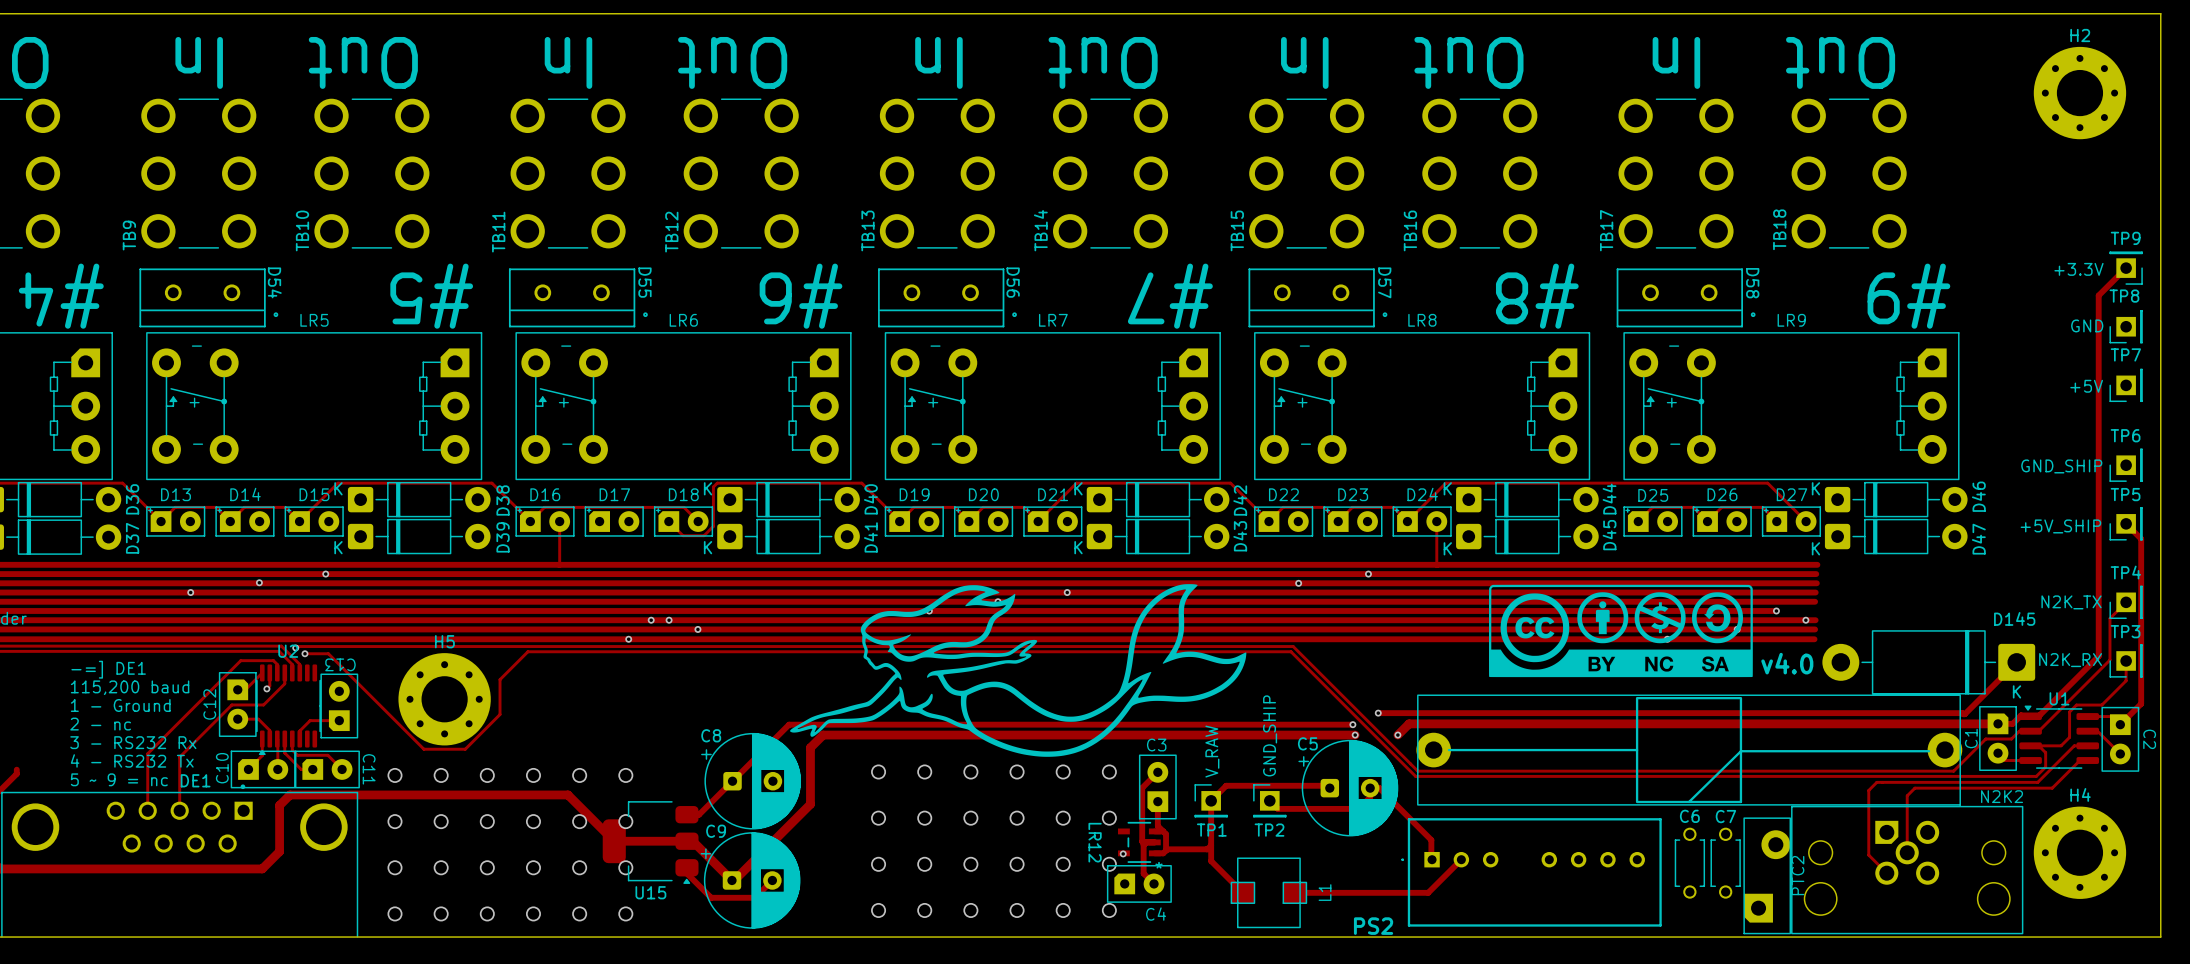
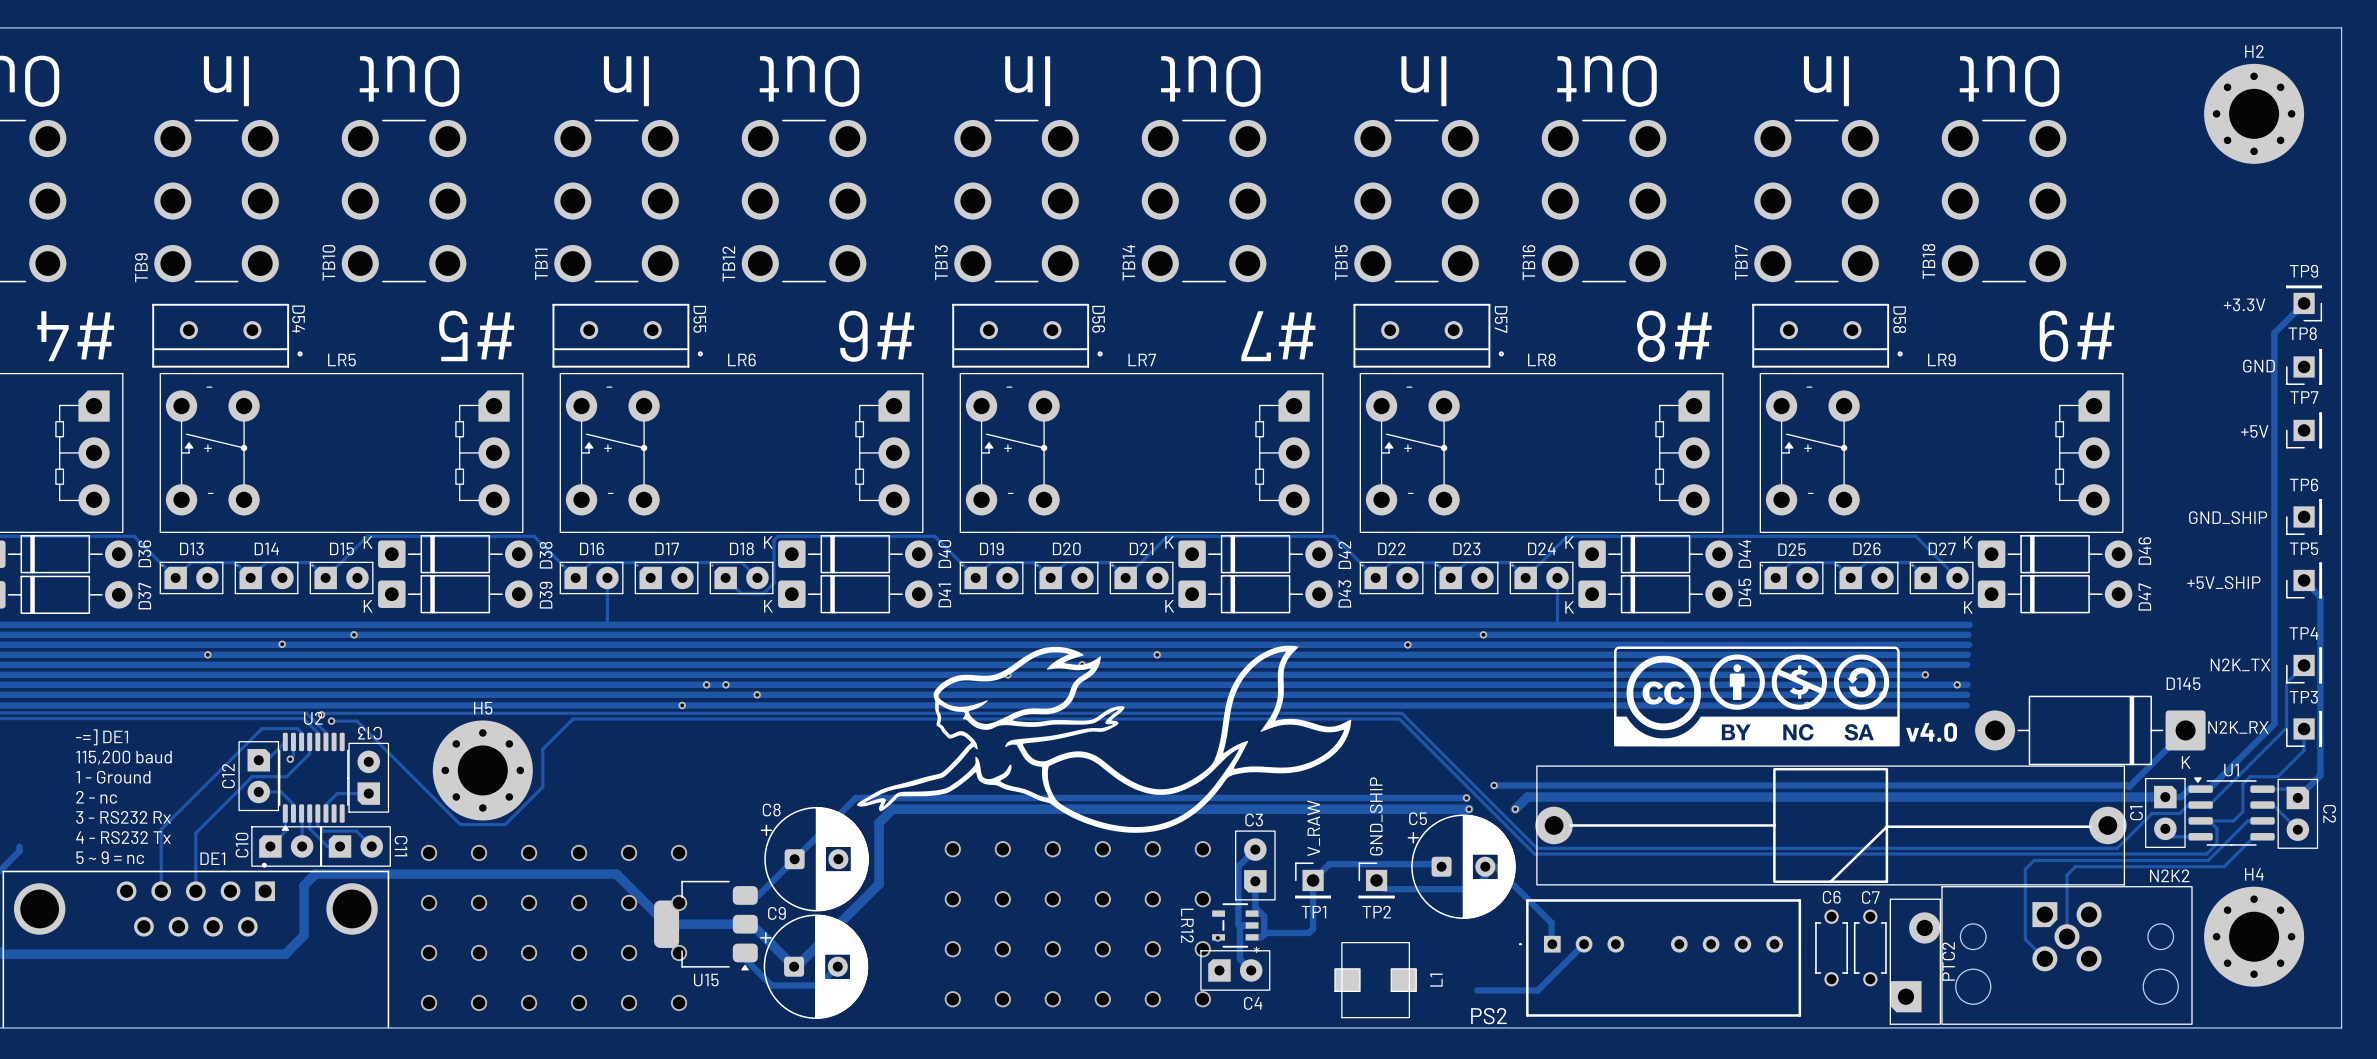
track: (1211, 845) (1211, 861) (1242, 892) -> none
track: (1294, 892) (1428, 892) -> (1477, 990) (1537, 990) (1548, 980)

